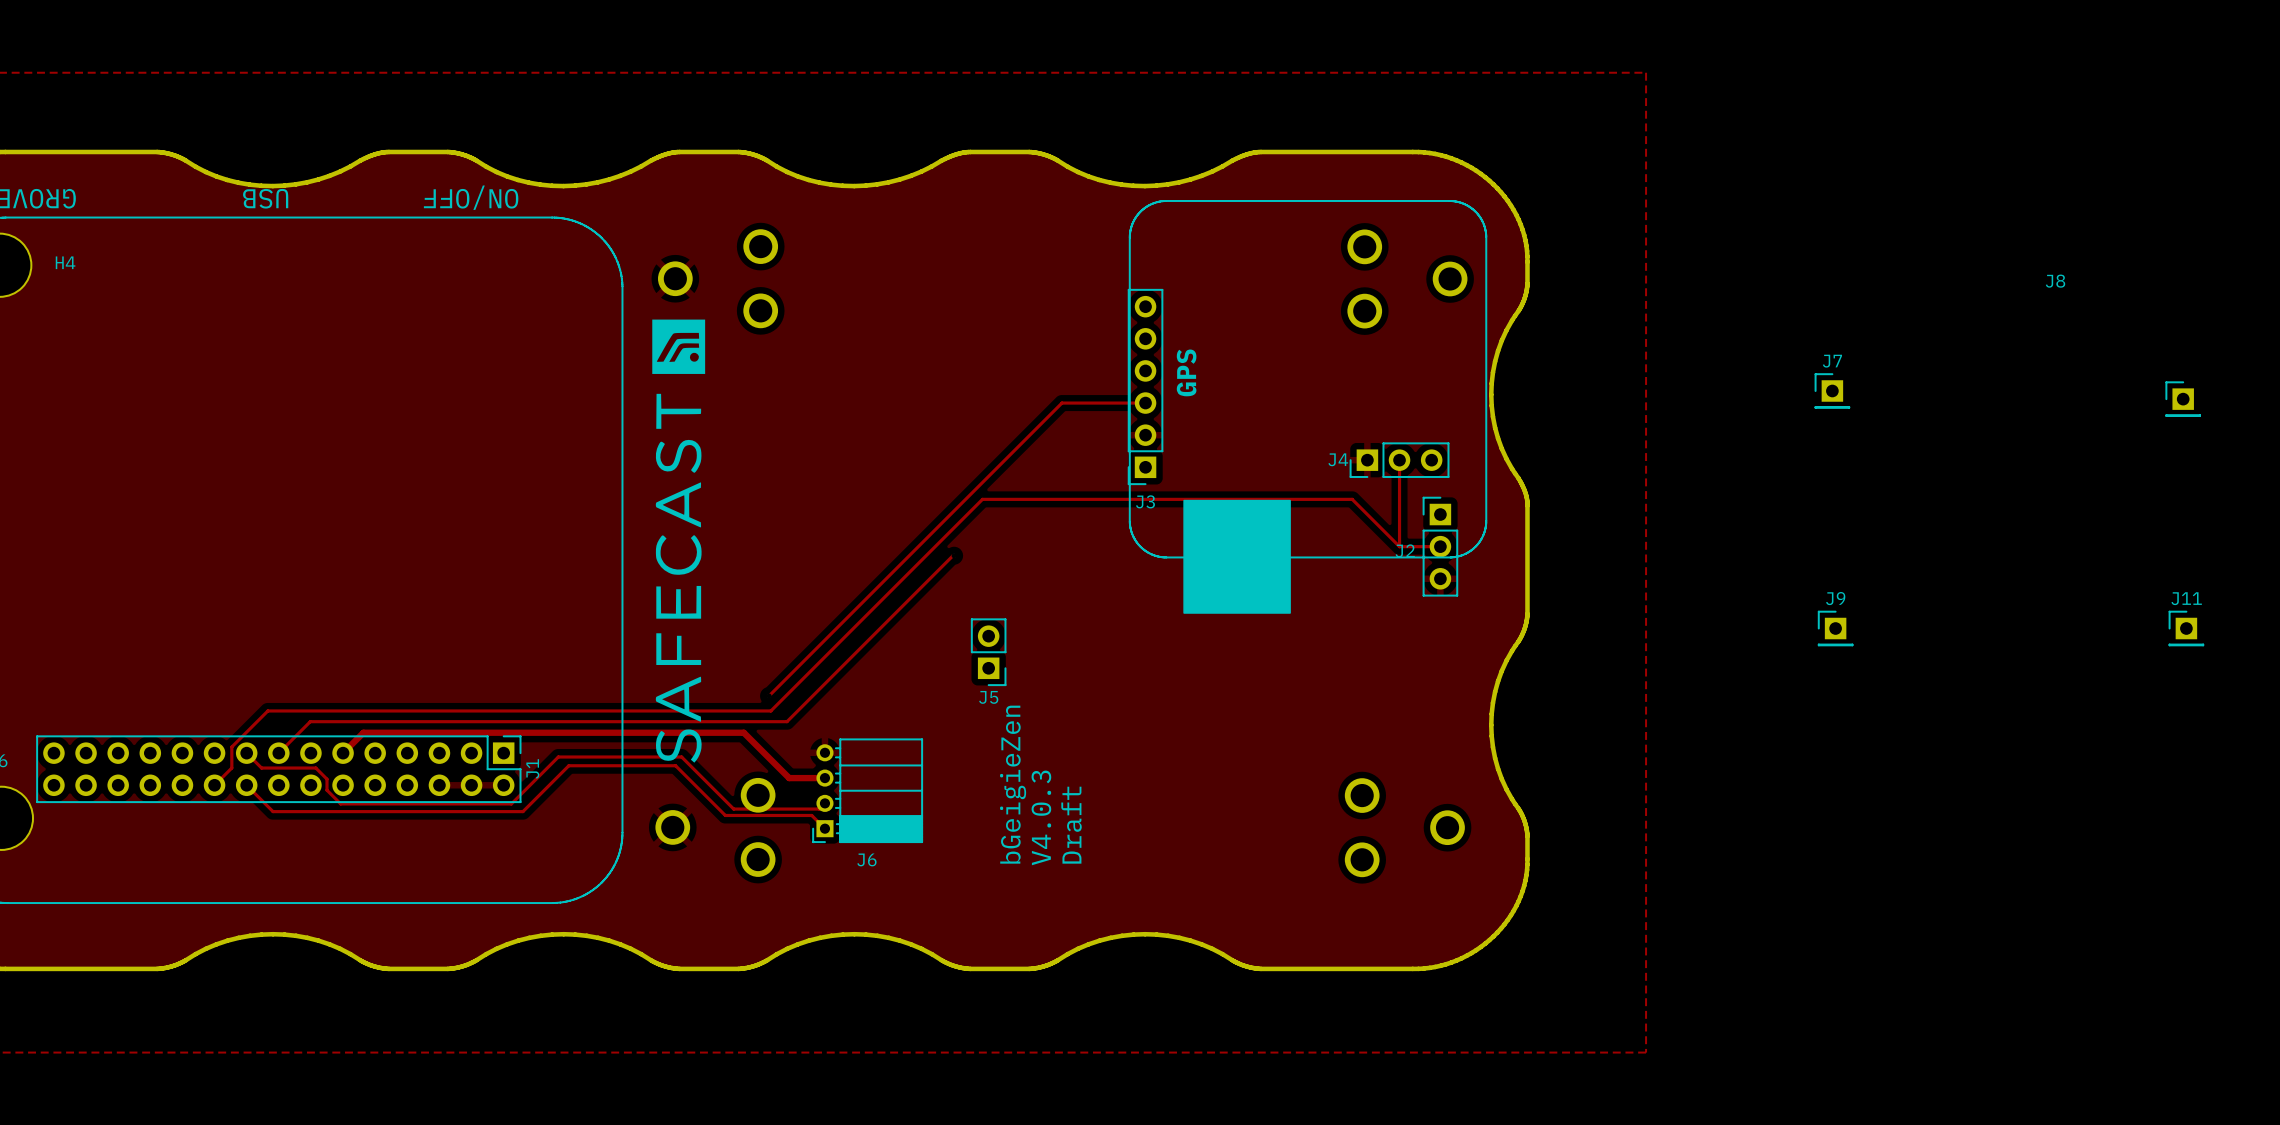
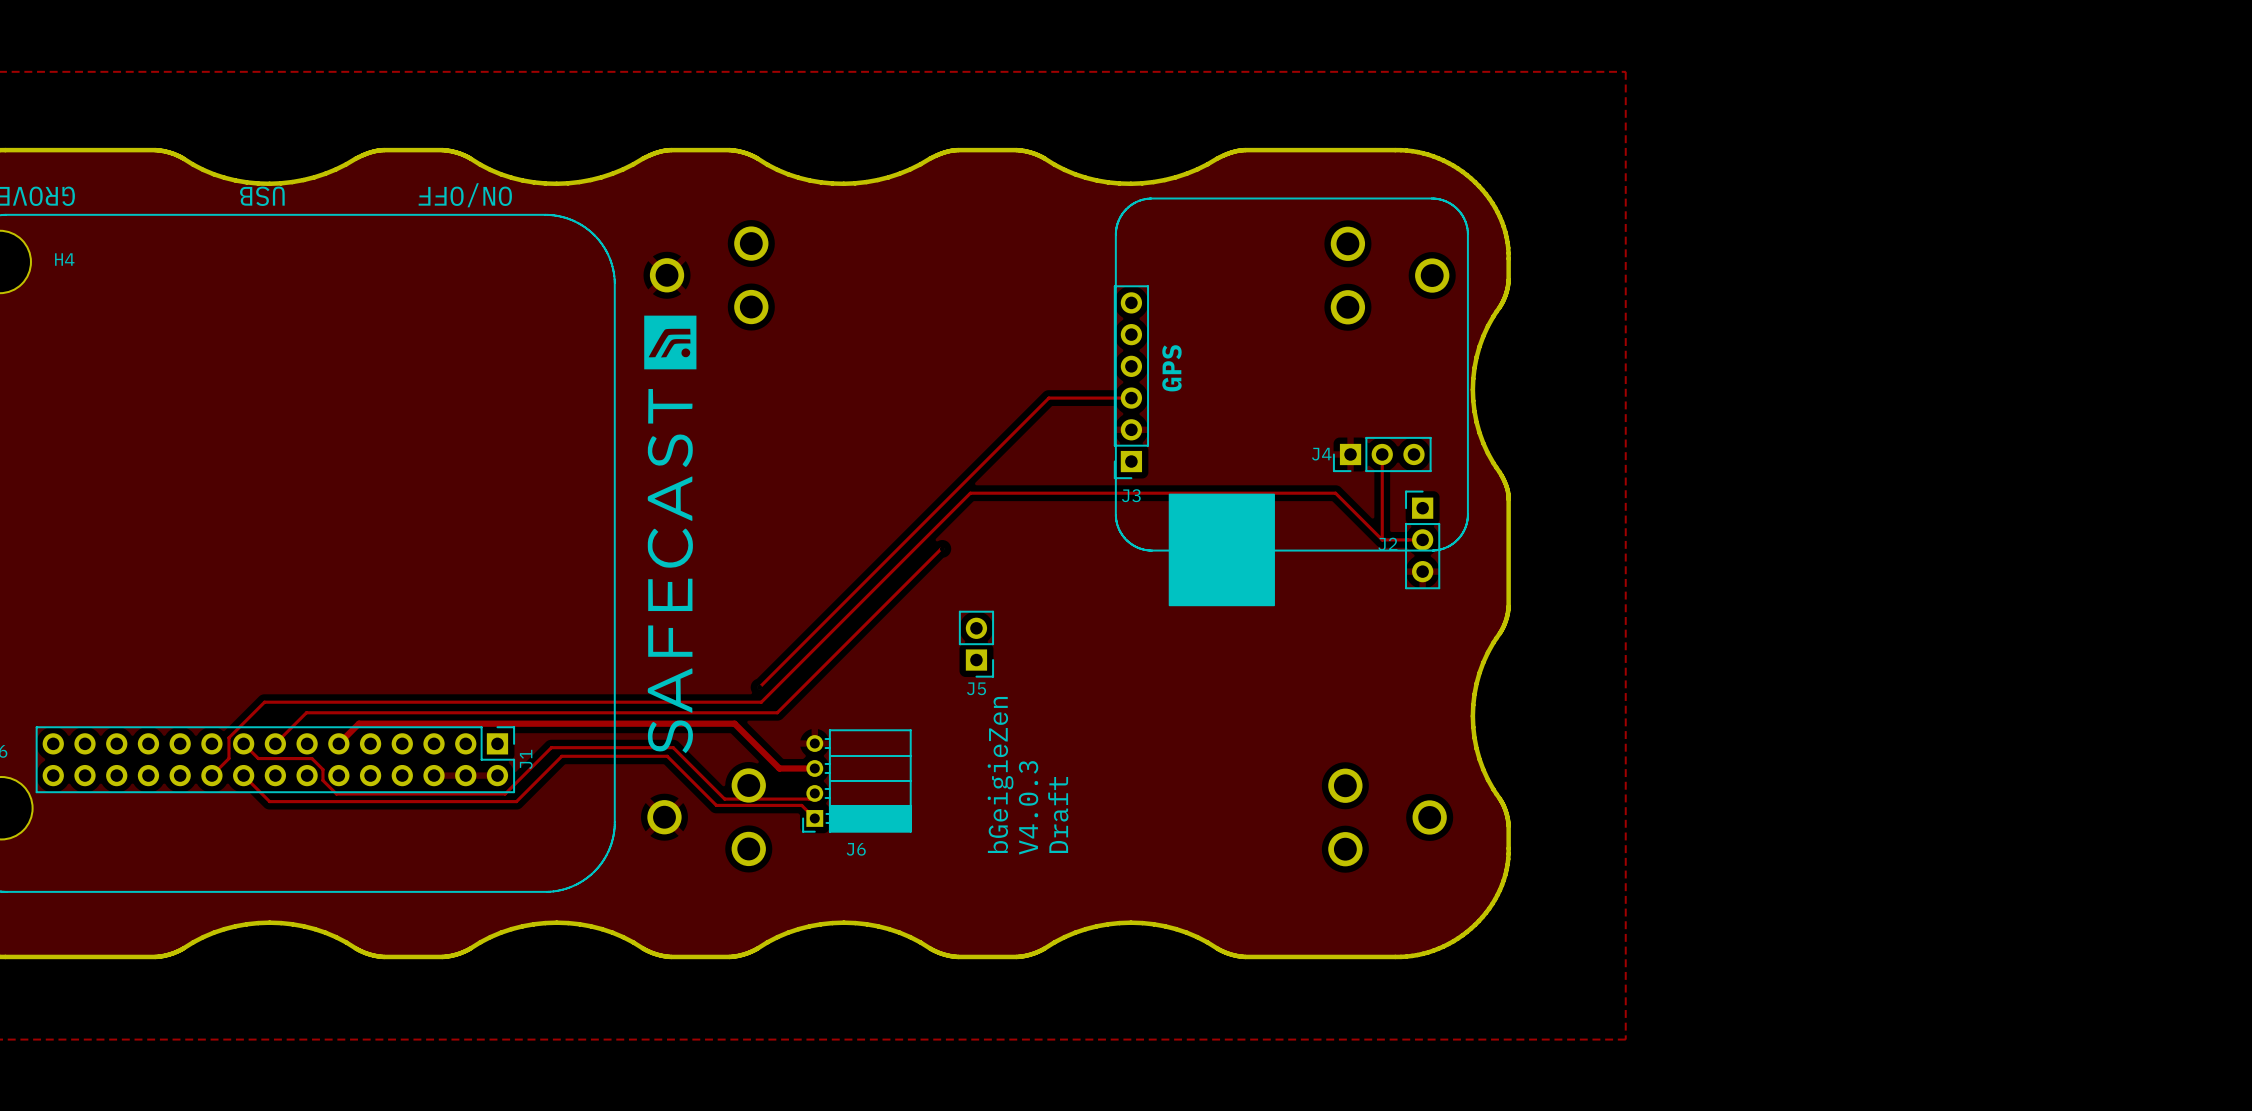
J7: (1832, 390) -> none
J8: (2183, 399) -> none
J9: (1835, 628) -> none
J11: (2186, 628) -> none

